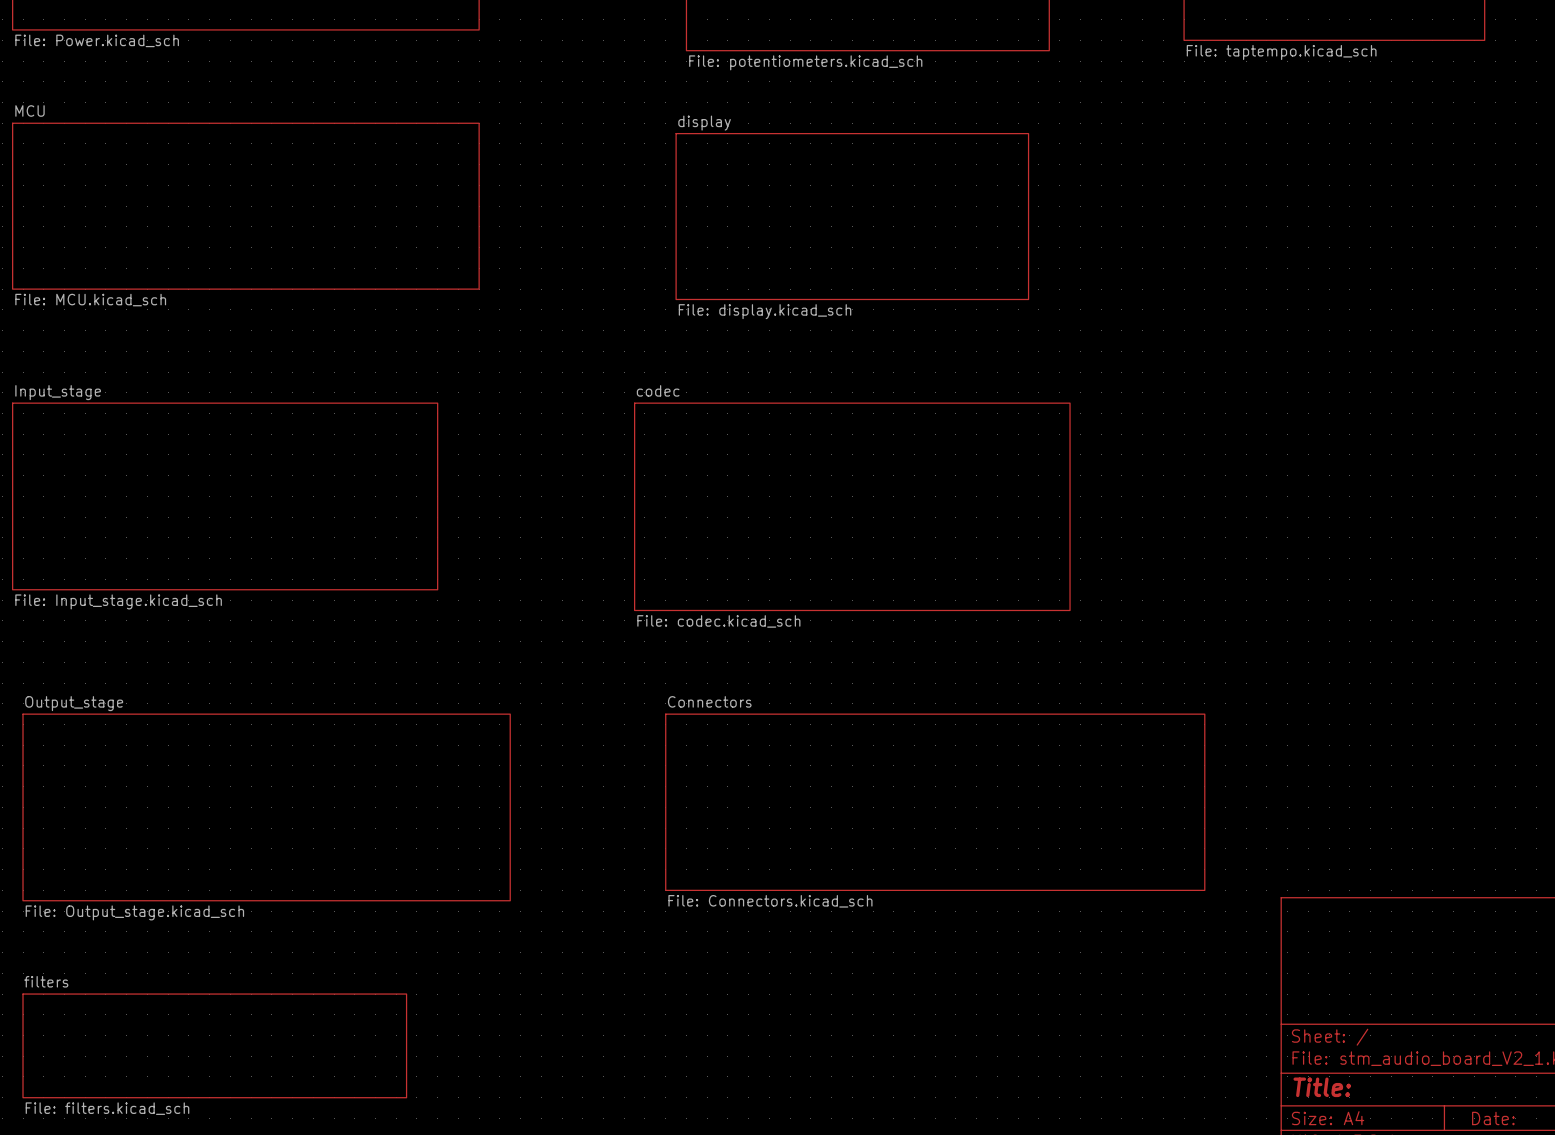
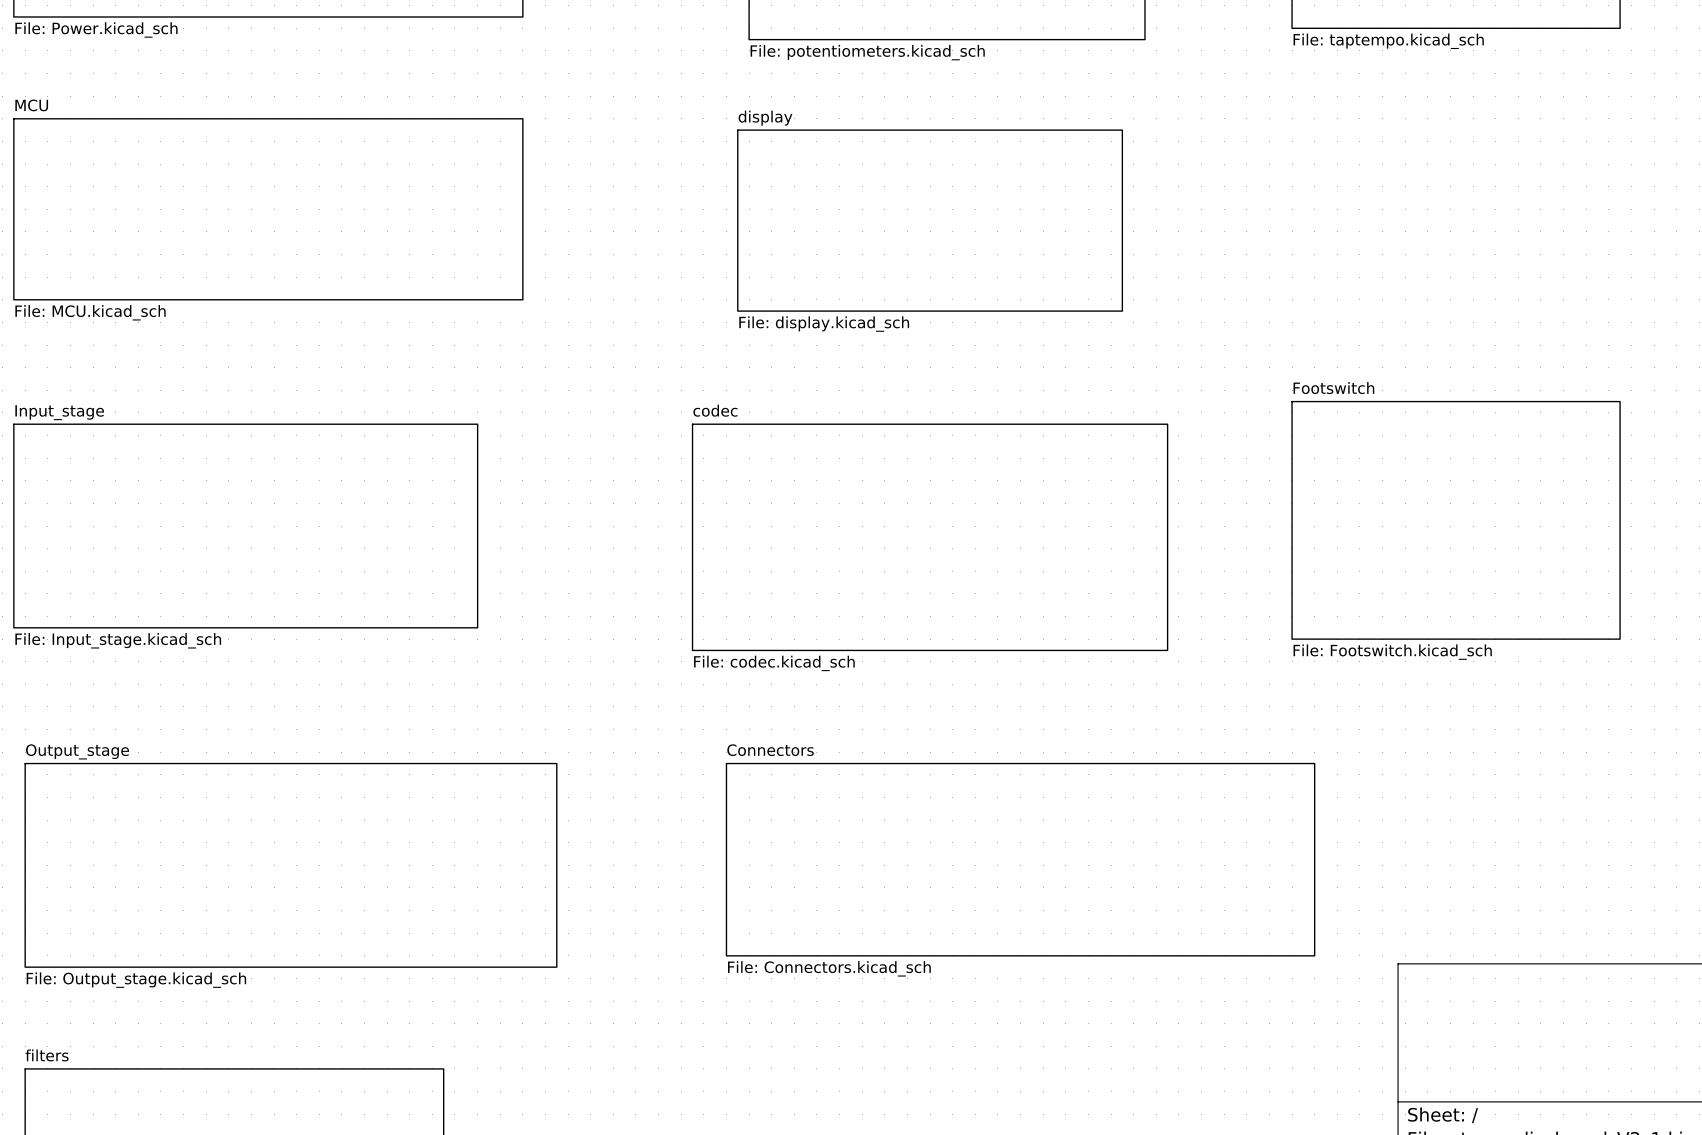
sheet Footswitch: none -> File: Footswitch.kicad_sch (1456, 520)

